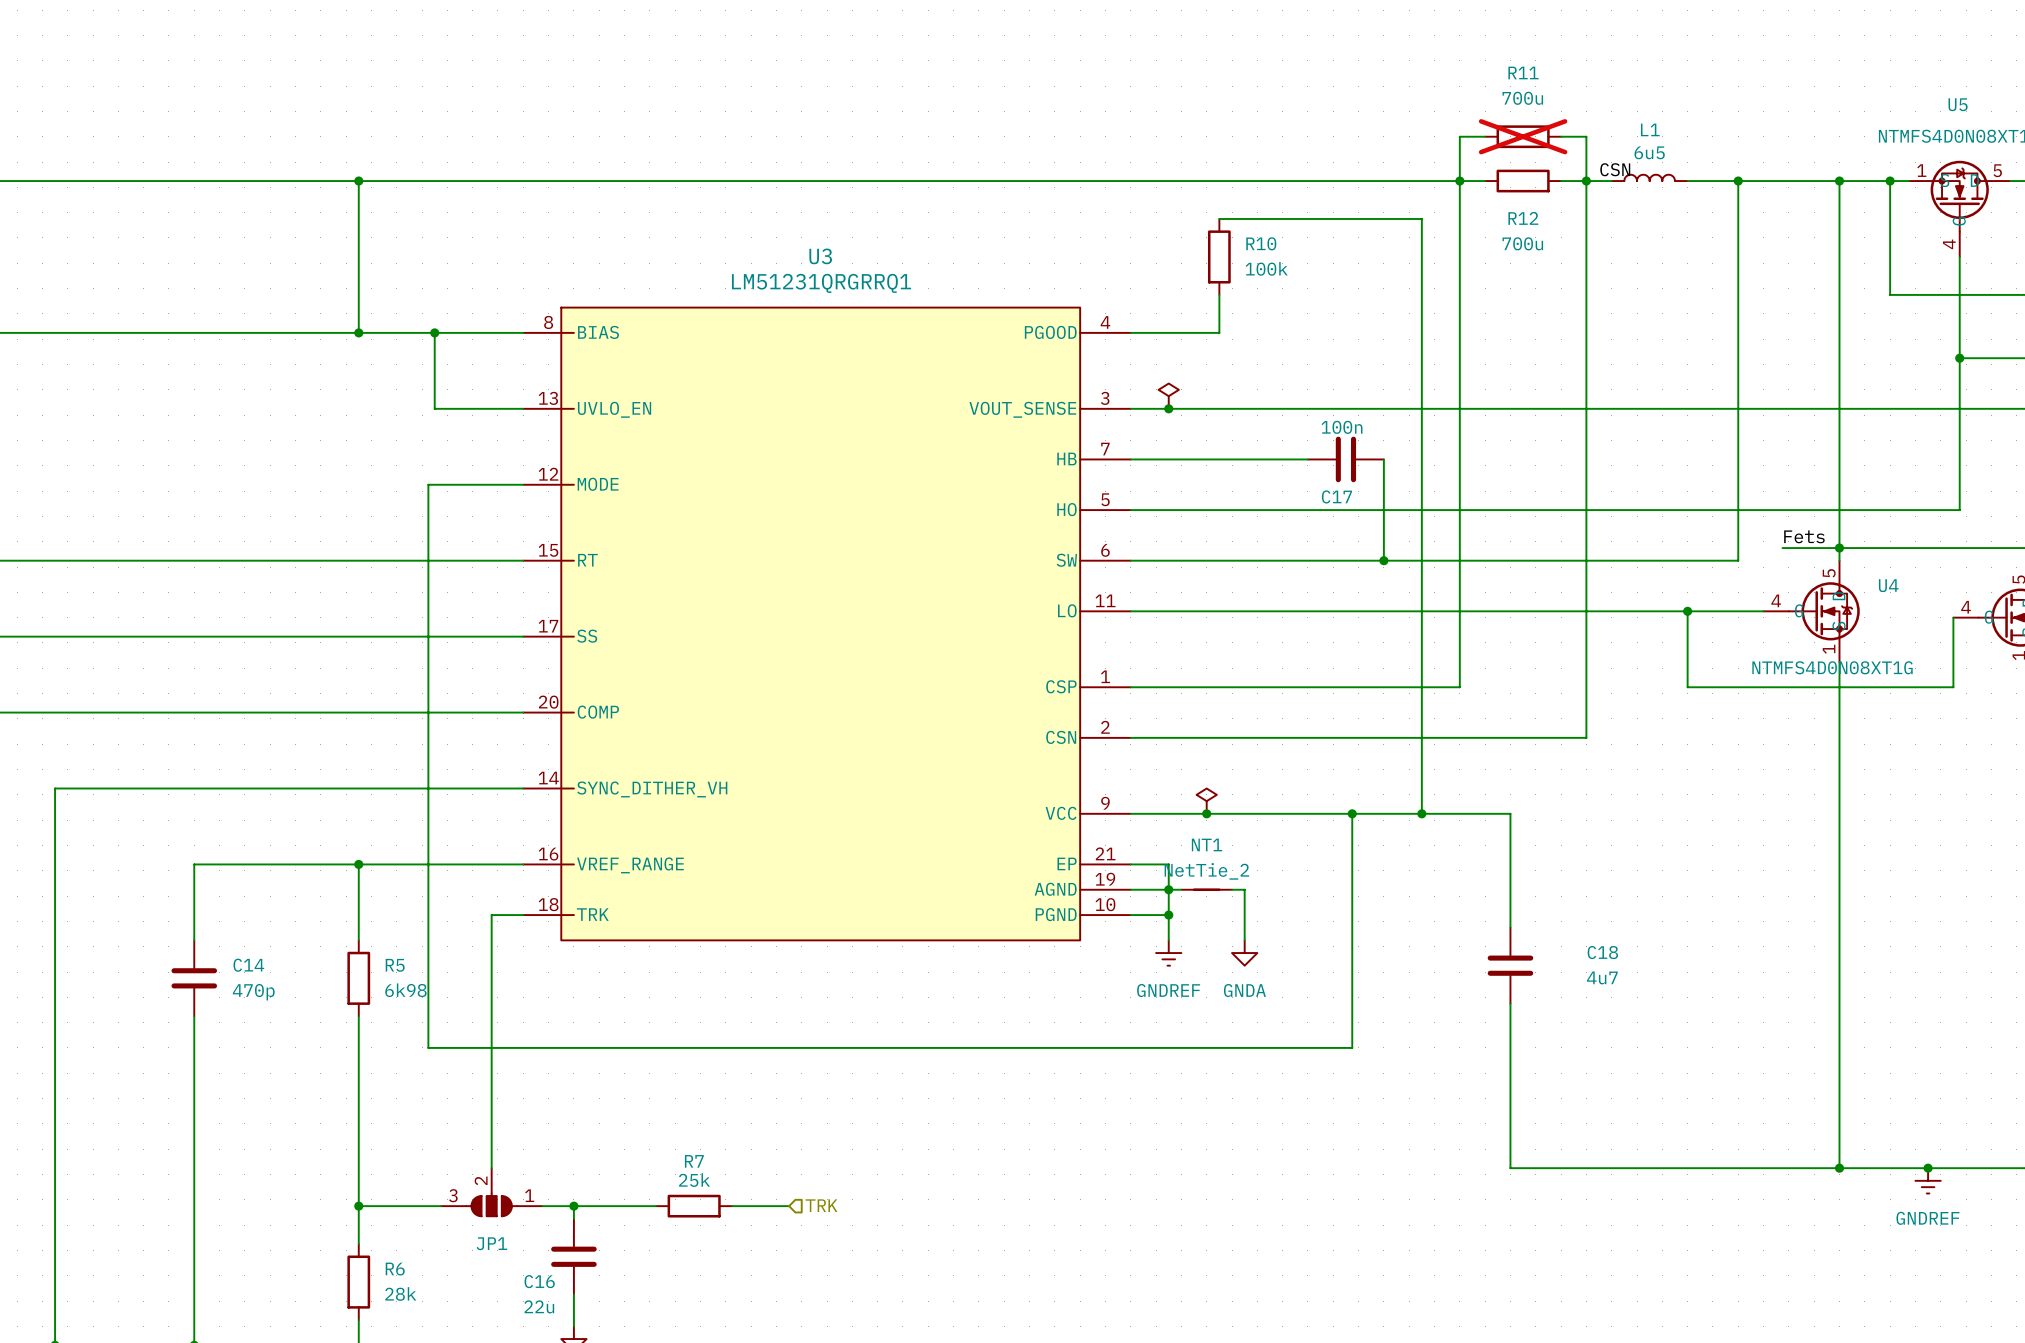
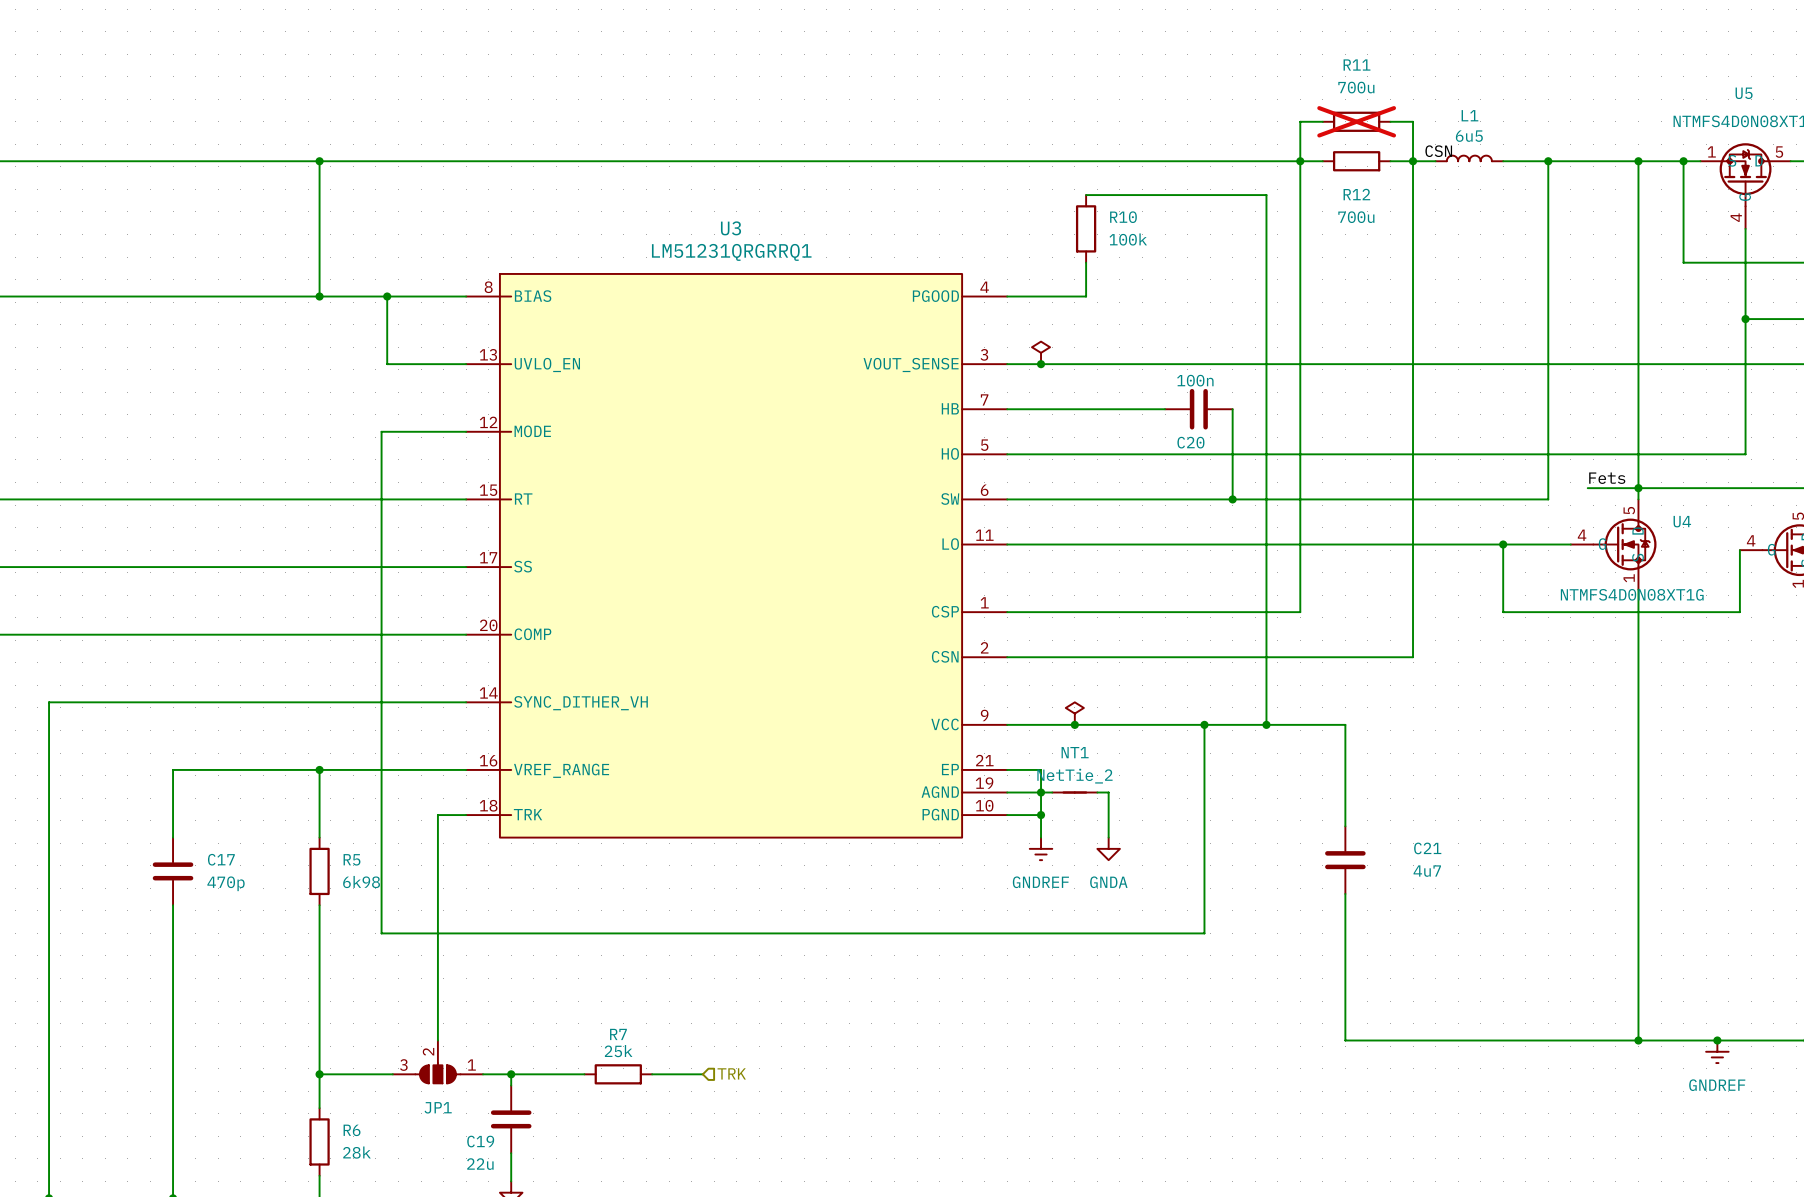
C17 name: C17 (1336, 496) -> C20 (1190, 442)
C18 name: C18 (1602, 952) -> C21 (1427, 848)
C14 name: C14 (248, 965) -> C17 (221, 859)
C16 name: C16 (539, 1281) -> C19 (480, 1141)

